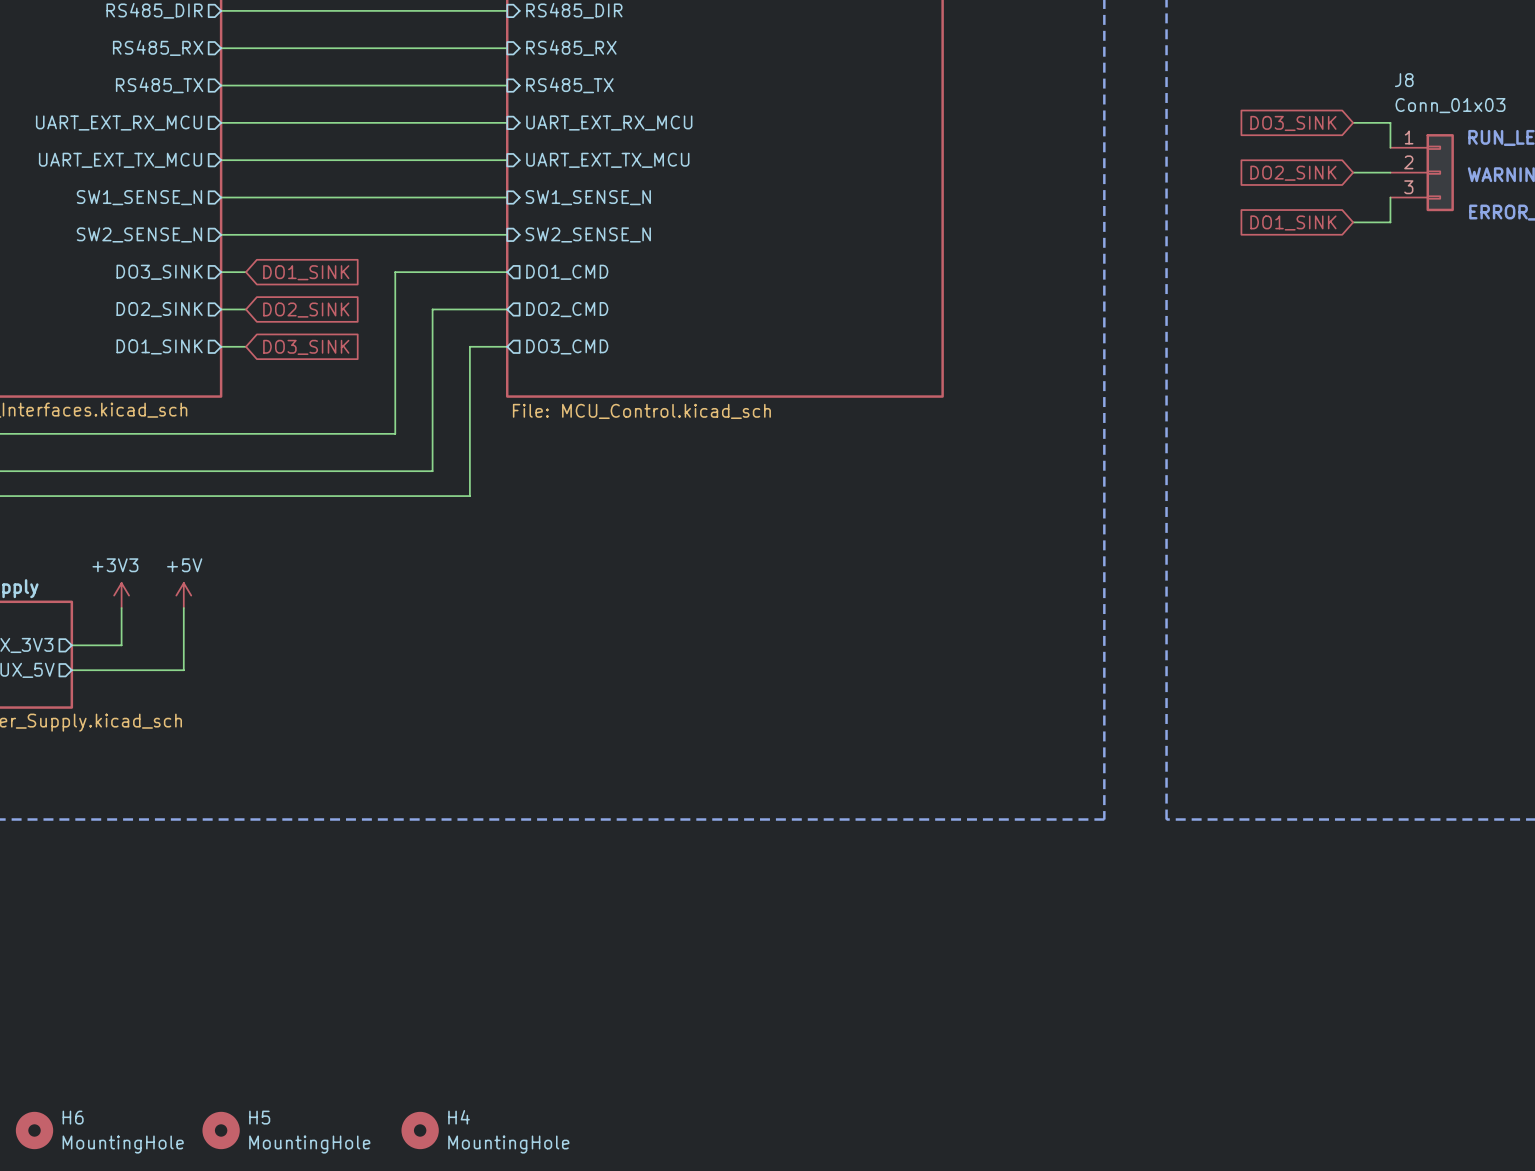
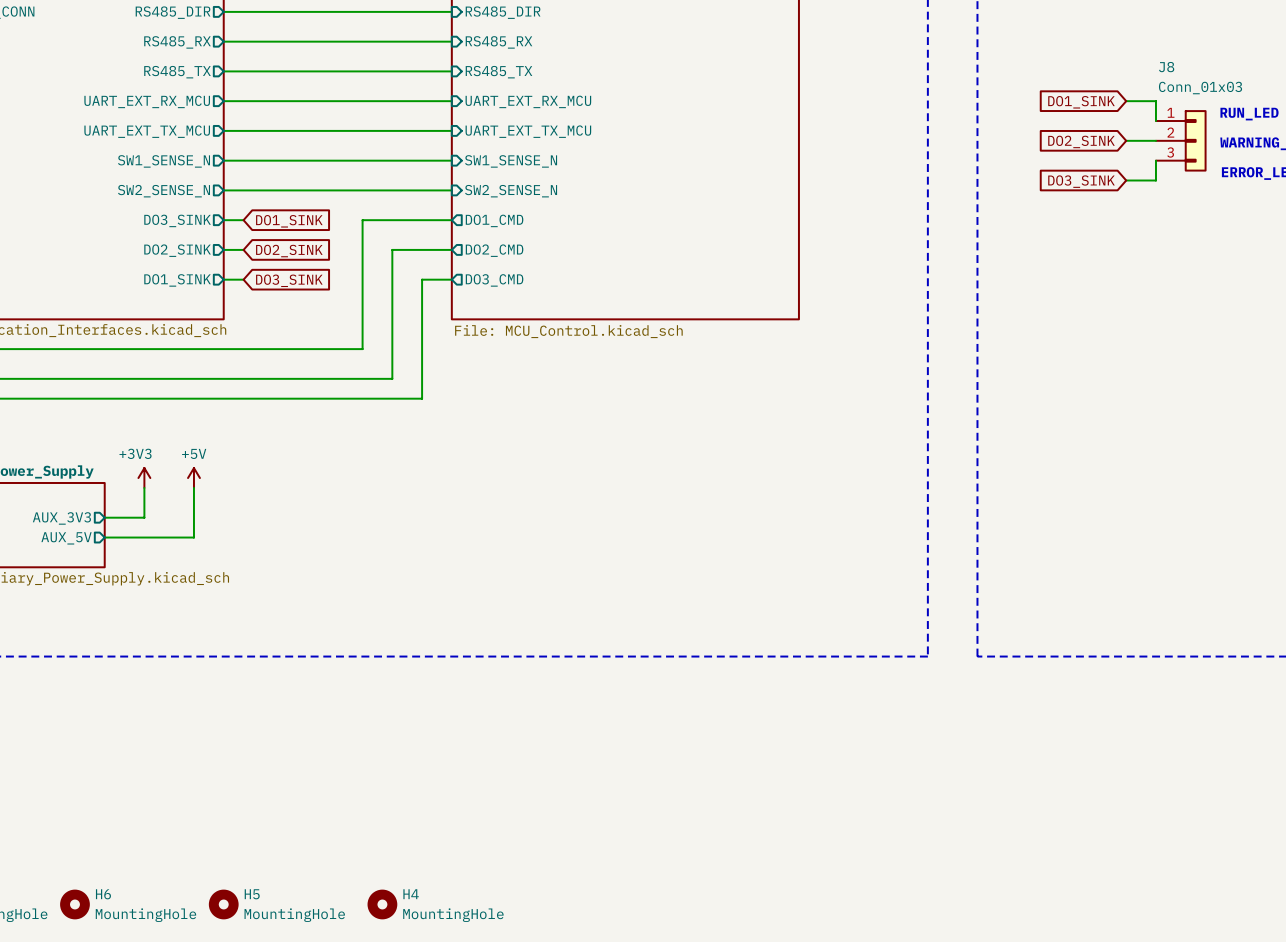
global label: DO3_SINK (1293, 123) -> DO1_SINK (1081, 102)
global label: DO1_SINK (1293, 222) -> DO3_SINK (1081, 181)

